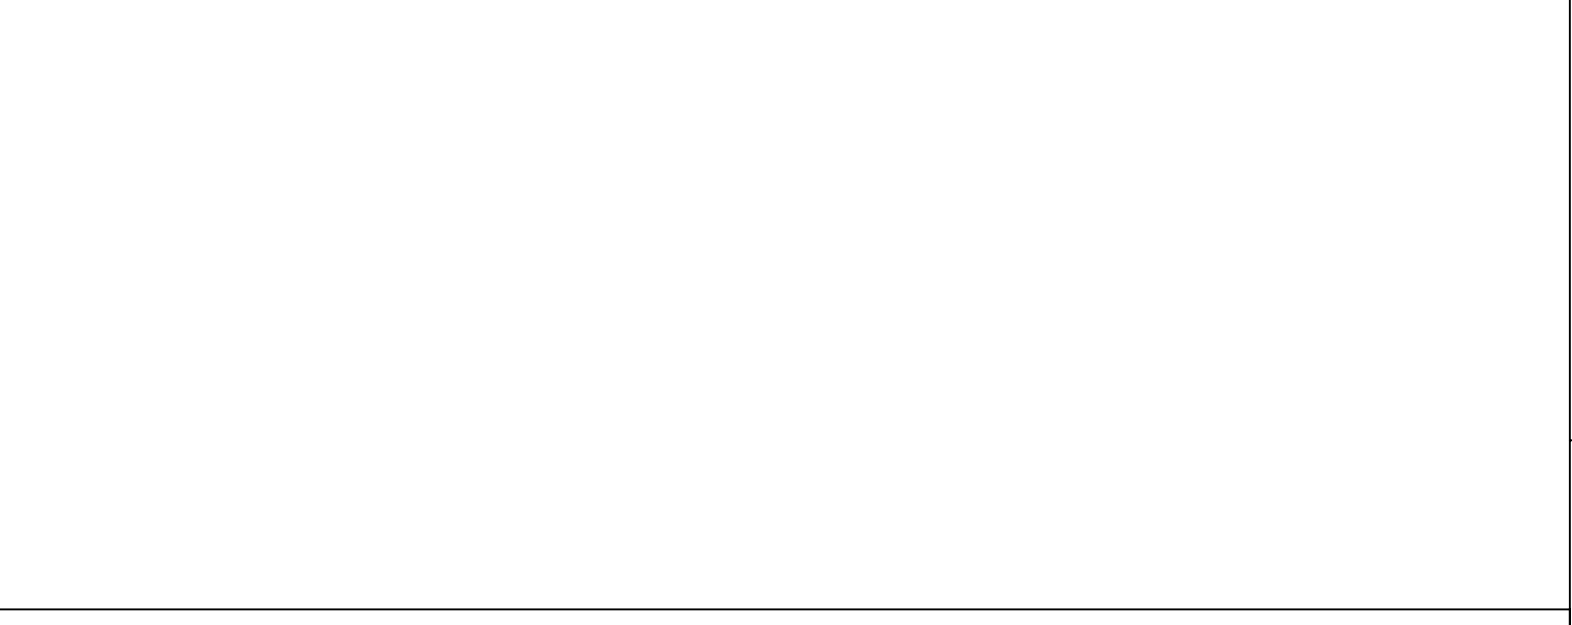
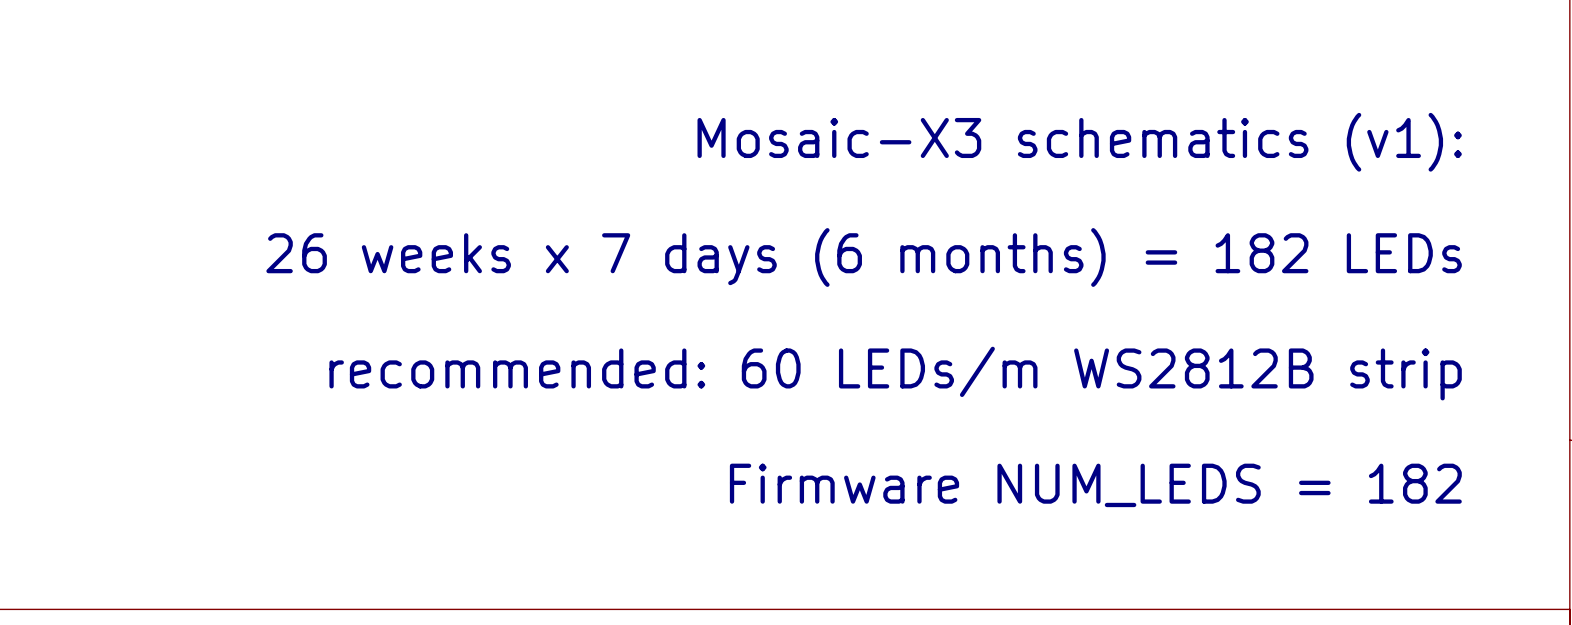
text: none -> Mosaic-X3 schematics (v1): (1079, 142)
text: none -> 26 weeks x 7 days (6 months) = 182 LEDs (864, 257)
text: none -> recommended: 60 LEDs/m WS2812B strip (895, 373)
text: none -> Firmware NUM_LEDS = 182 (1095, 485)

